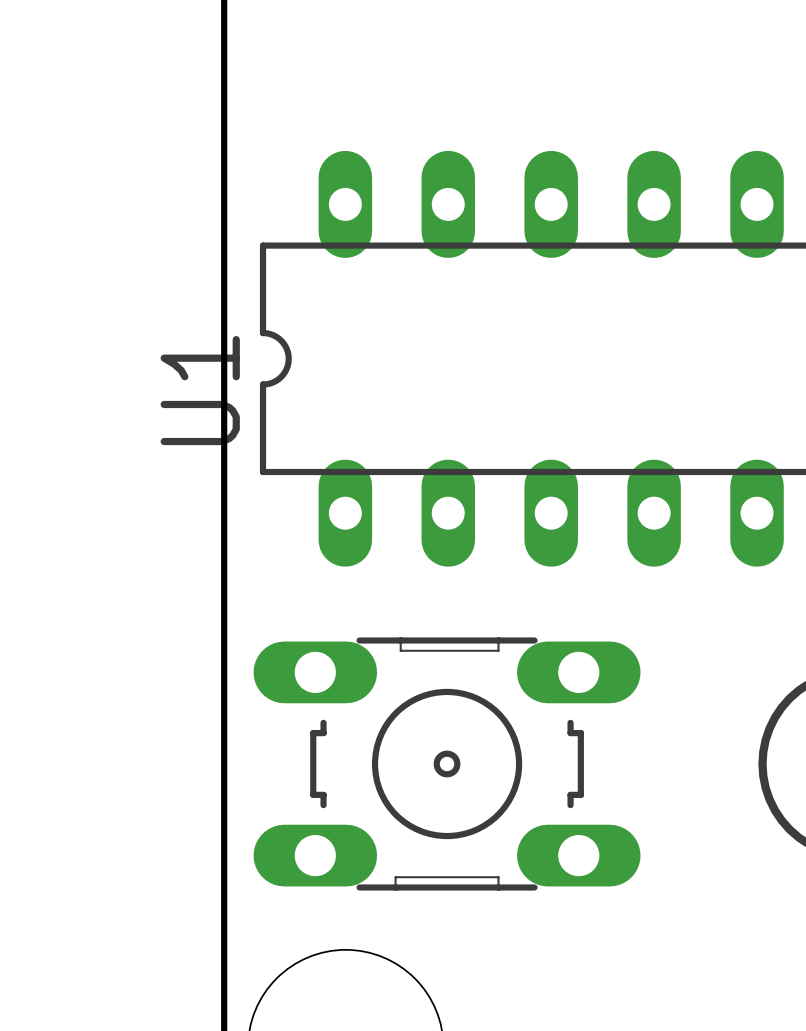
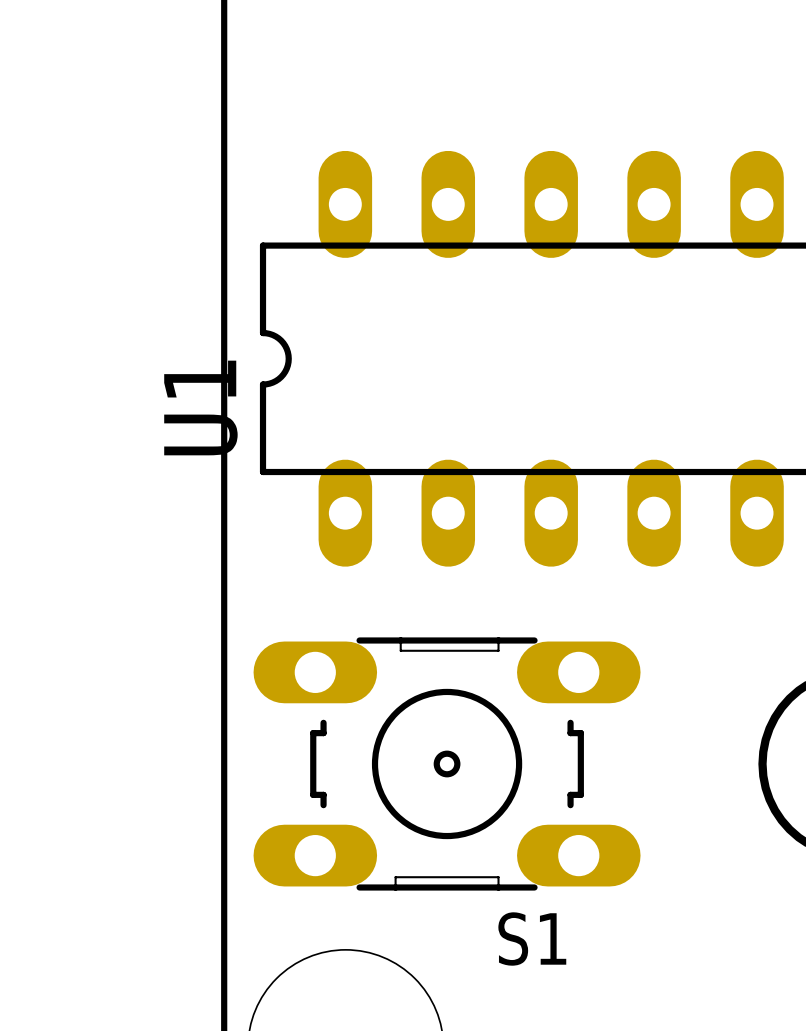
S1 name: none -> S1 (532, 939)

